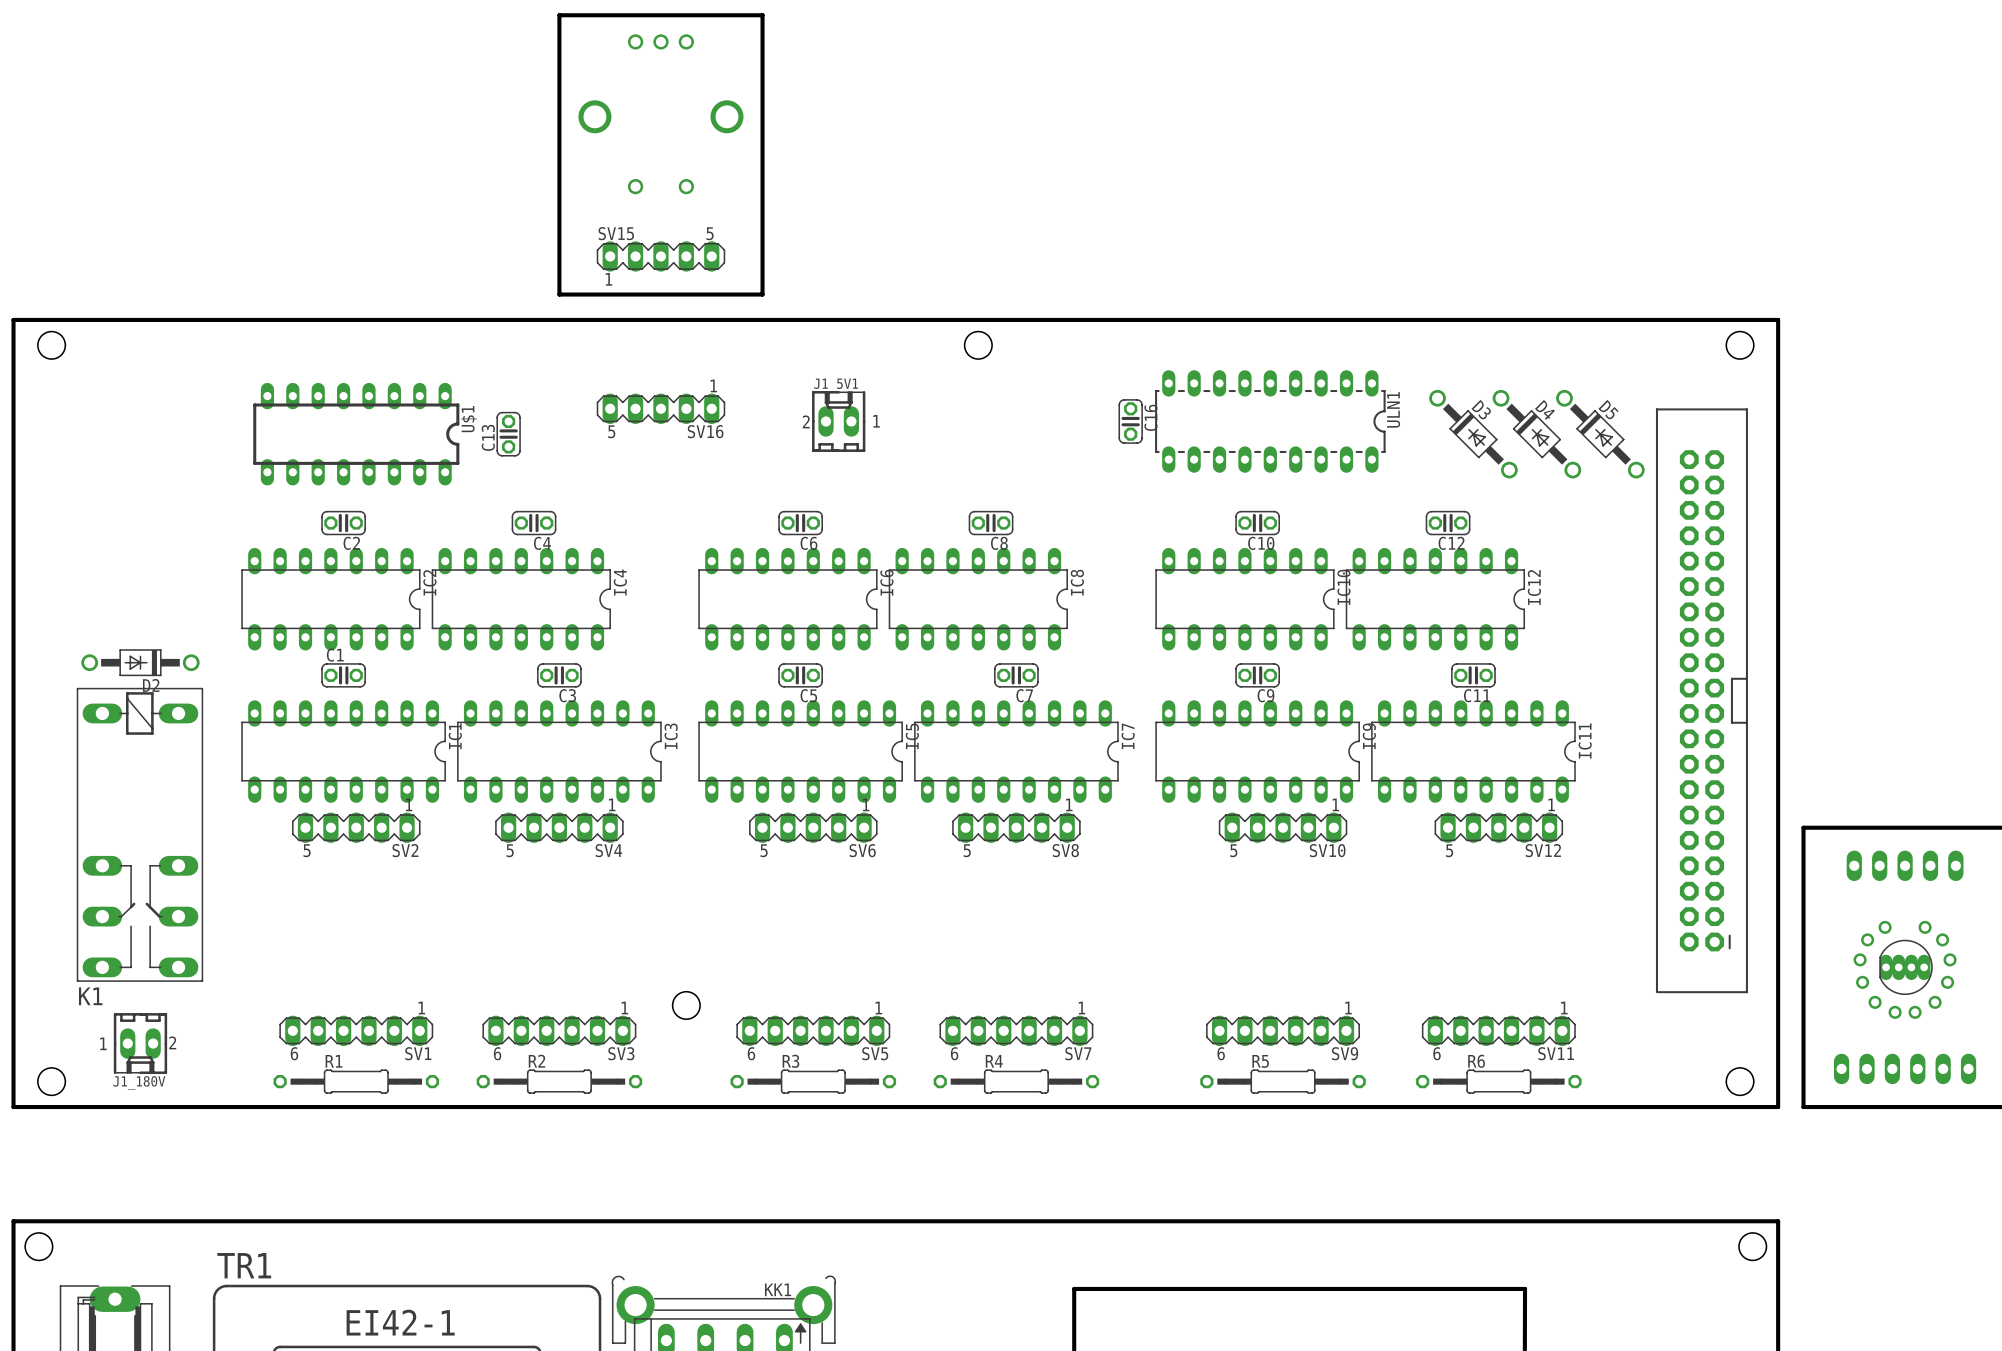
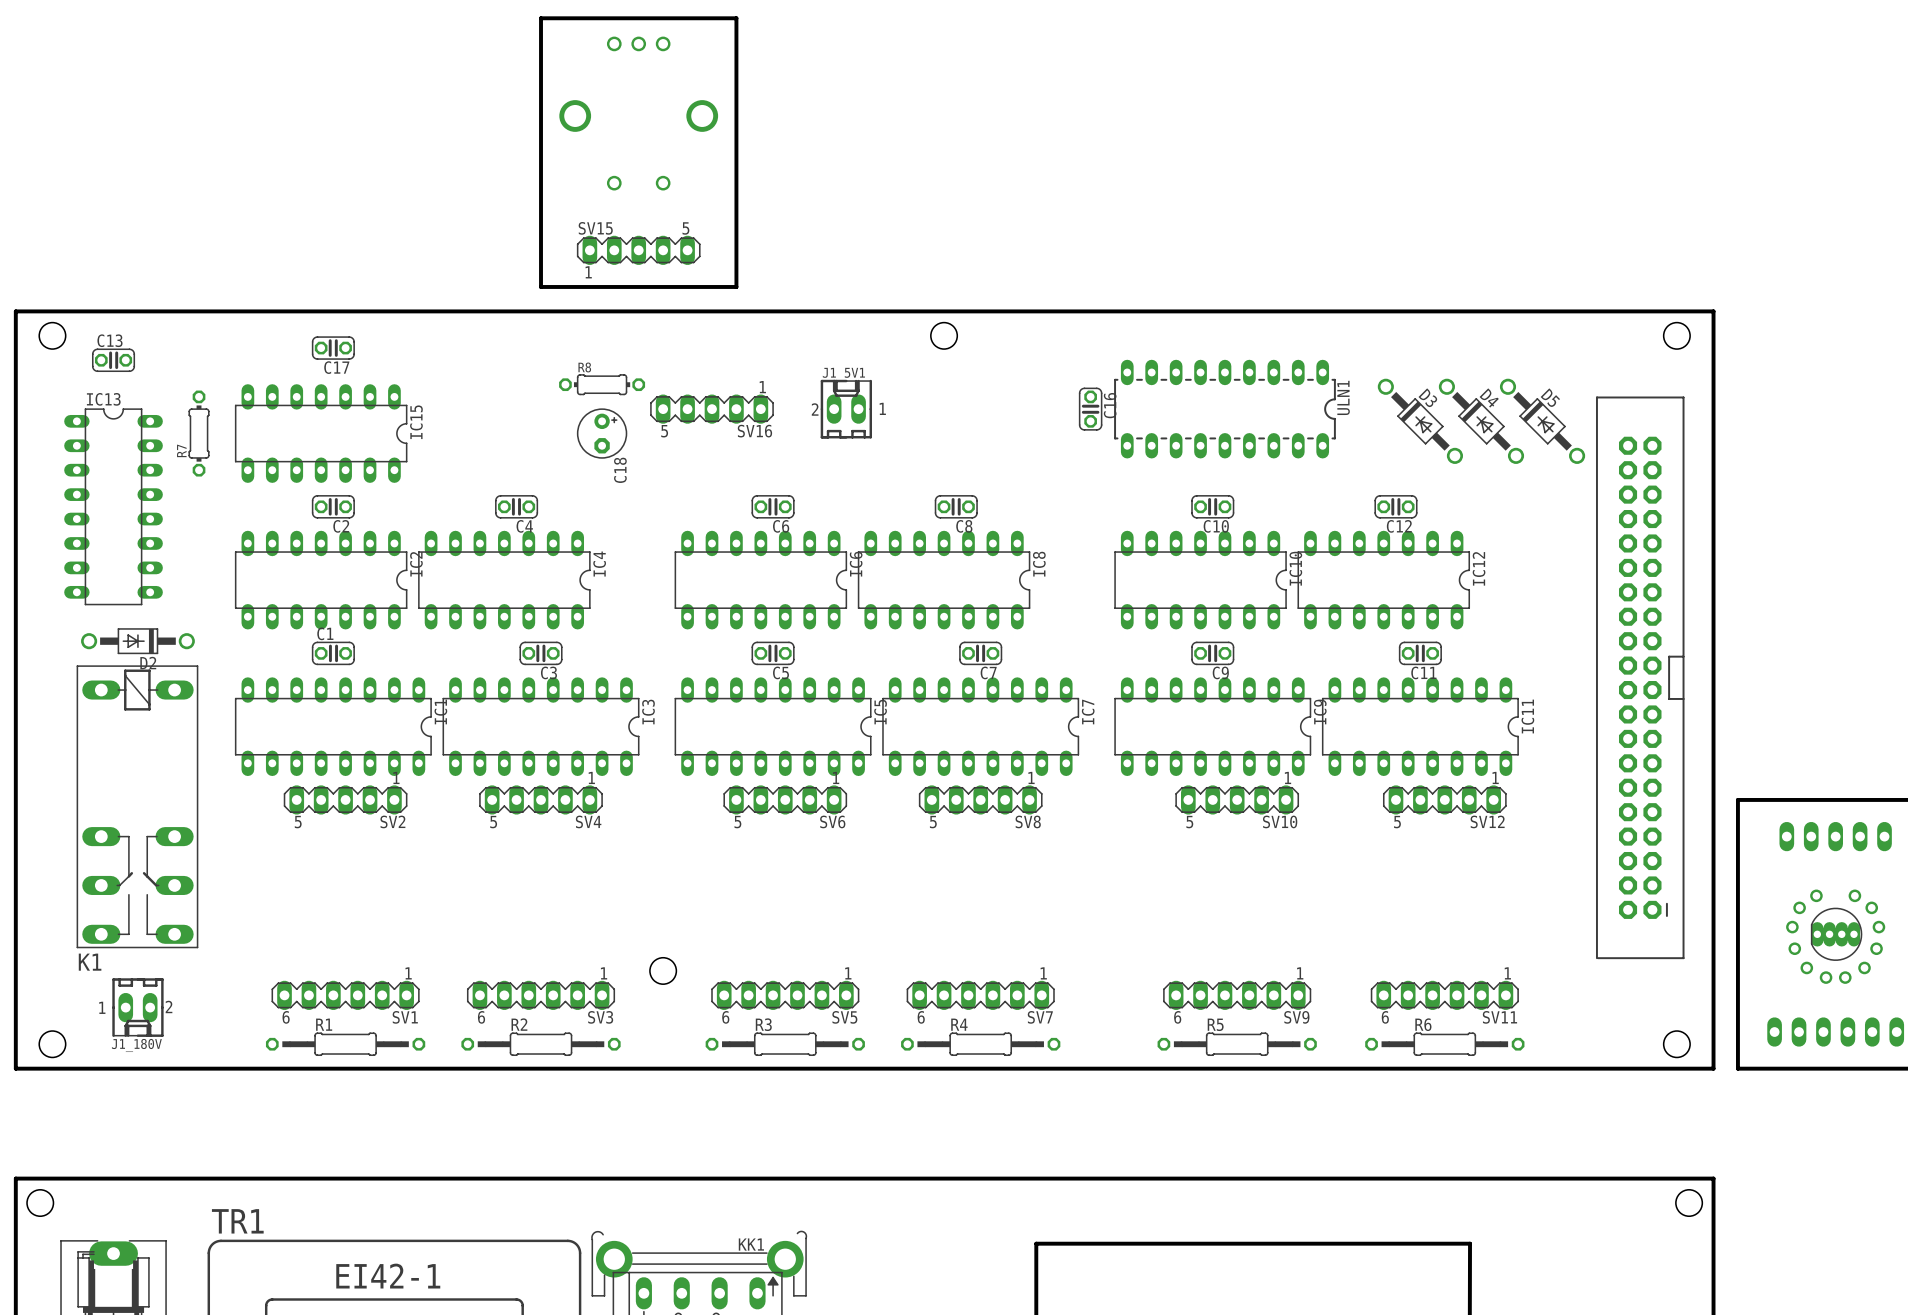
C17: none -> (333, 348)
R8: none -> (602, 384)
SV16 position: (660, 408) -> (712, 409)
J1_5V1 position: (838, 421) -> (846, 409)
U$1: (356, 434) -> none
C13 rotation: 0° (508, 434) -> 90° clockwise (113, 360)
C13 position: (508, 434) -> (113, 360)
R7: none -> (199, 433)
IC15: none -> (321, 433)
C18: none -> (602, 433)
IC13: none -> (113, 506)

